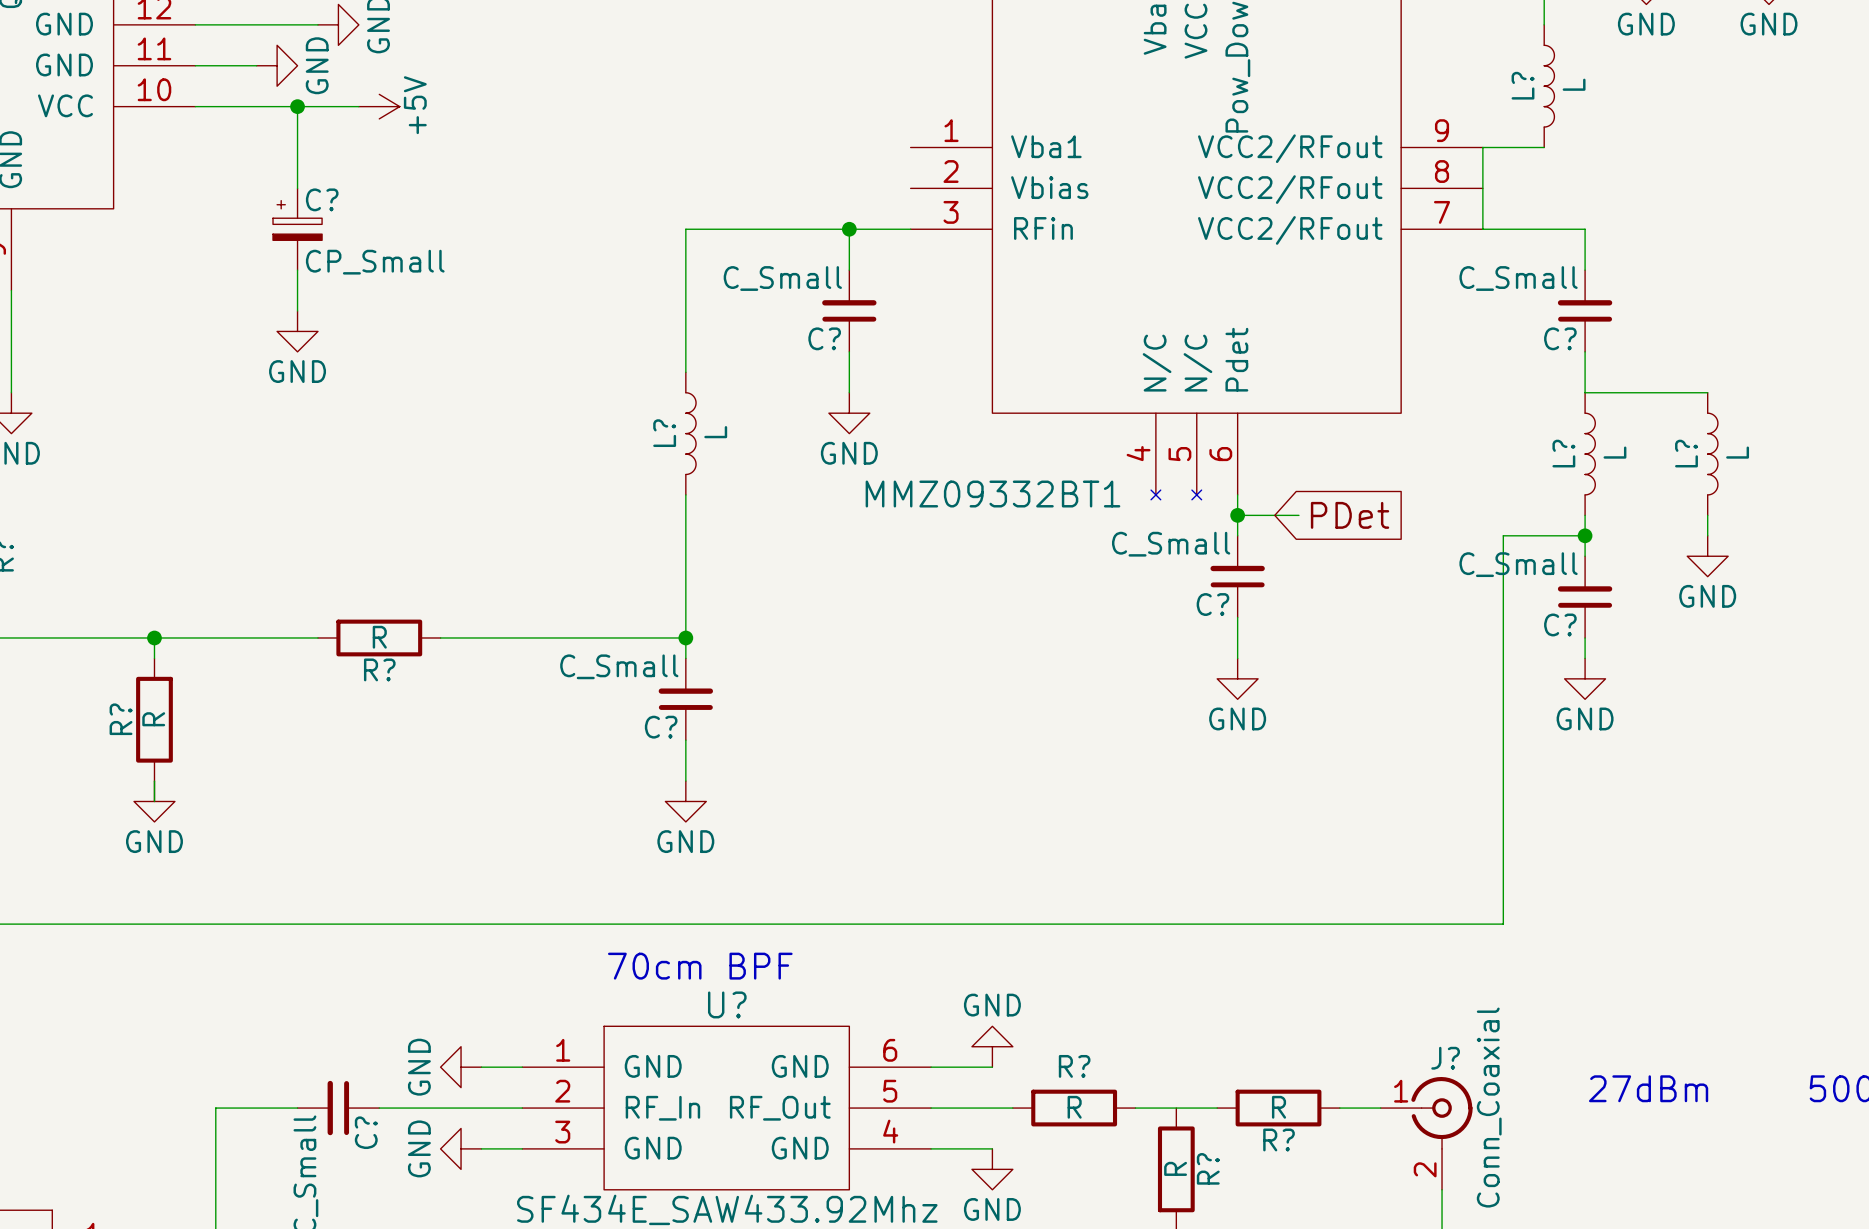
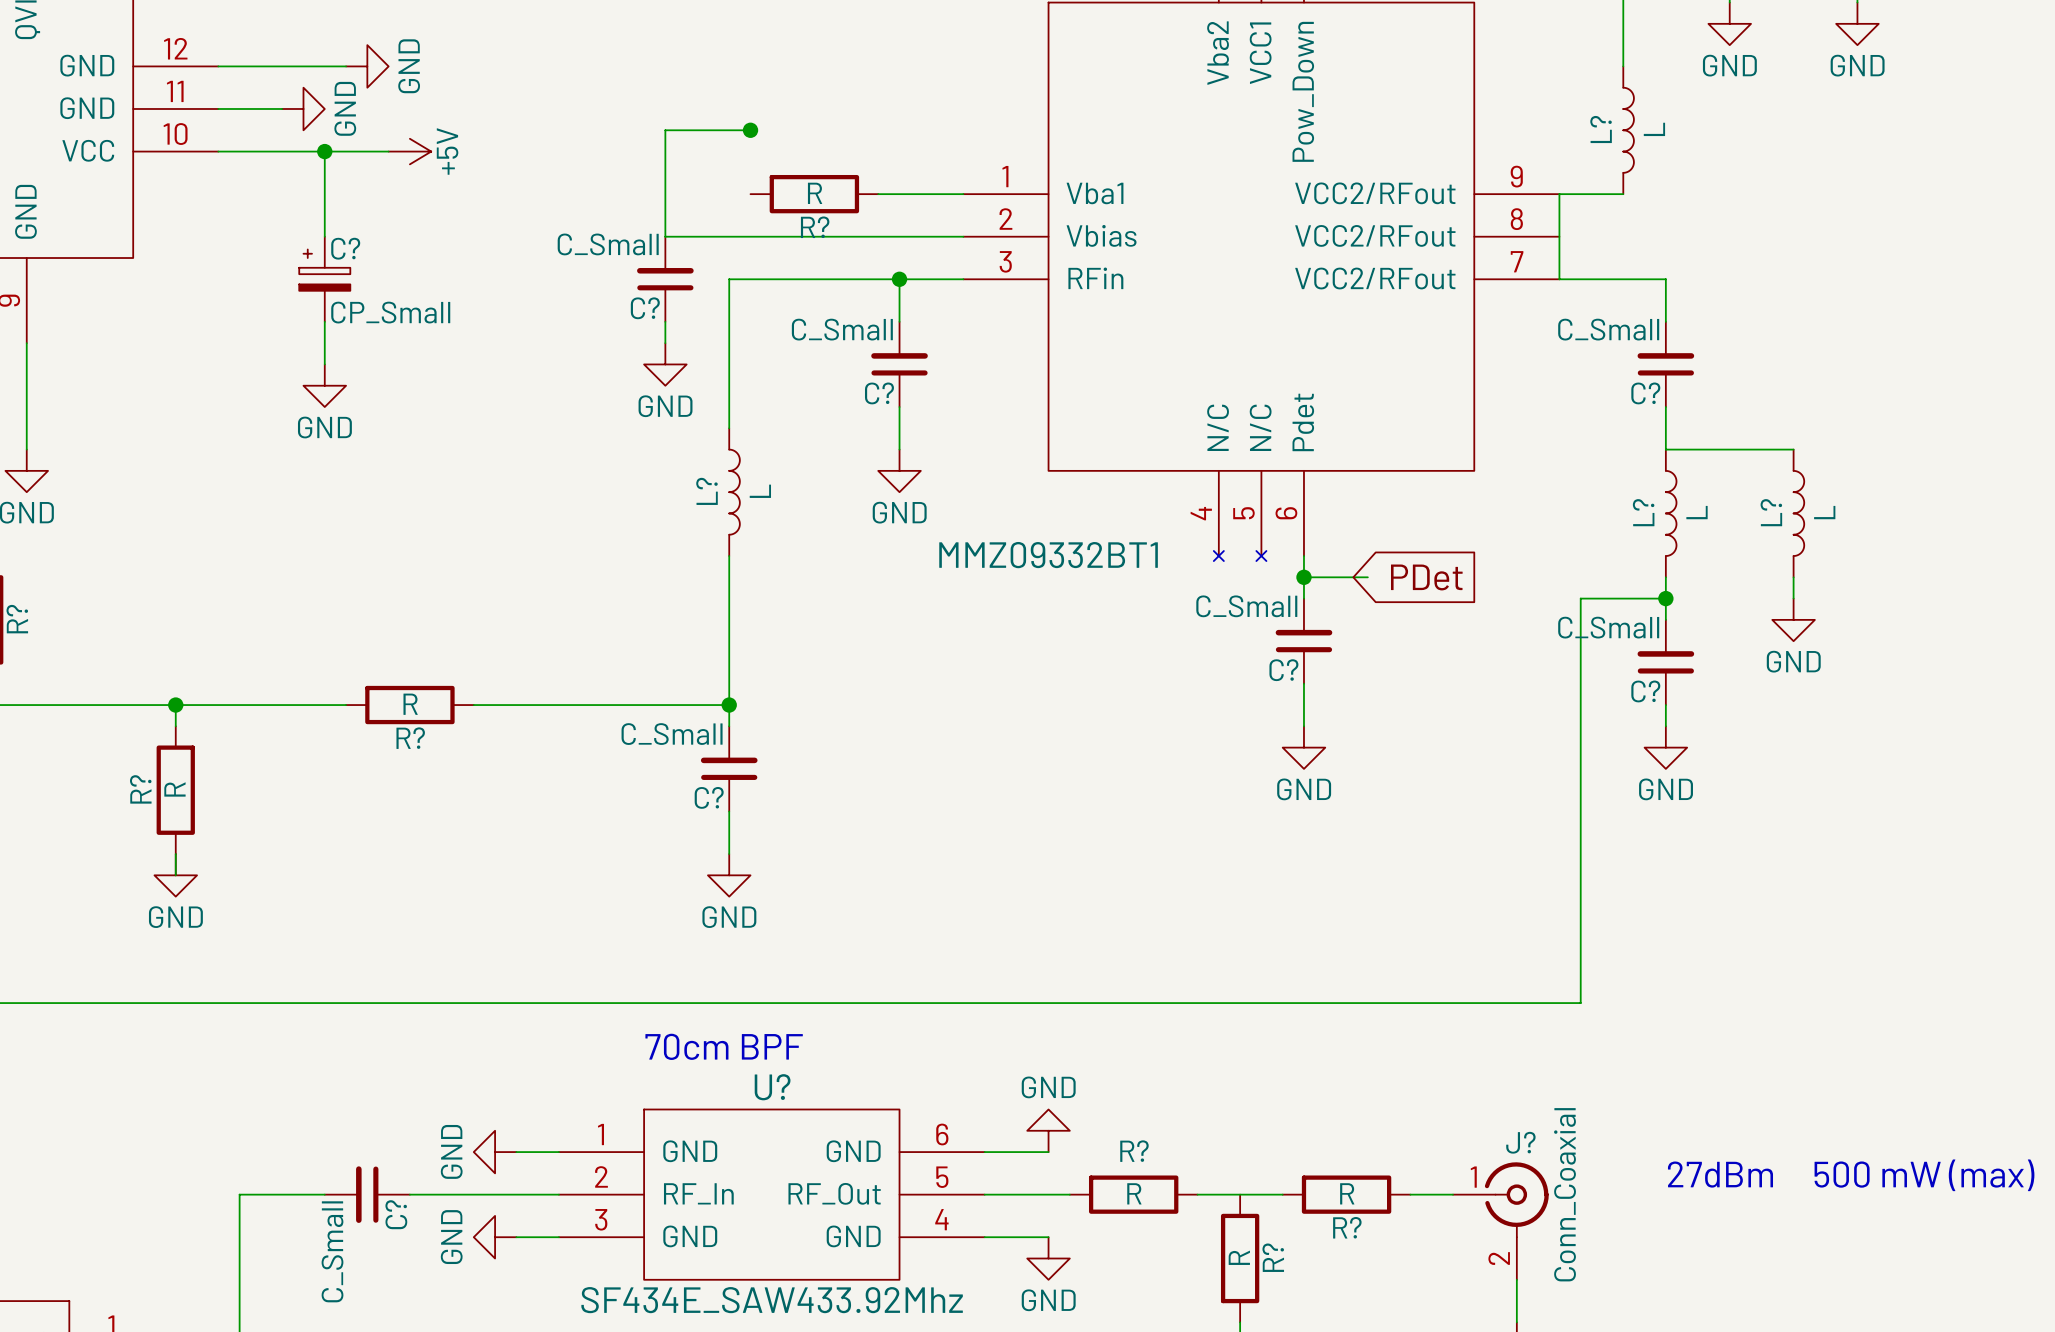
wire: none -> (750, 130) (665, 130) (665, 236) (963, 236)
junction: none -> (750, 130)
R?: none -> R (814, 194)
wire: none -> (878, 194) (963, 194)
C?: none -> C_Small (665, 279)
wire: none -> (665, 321) (665, 343)
power symbol: none -> GND (665, 364)

